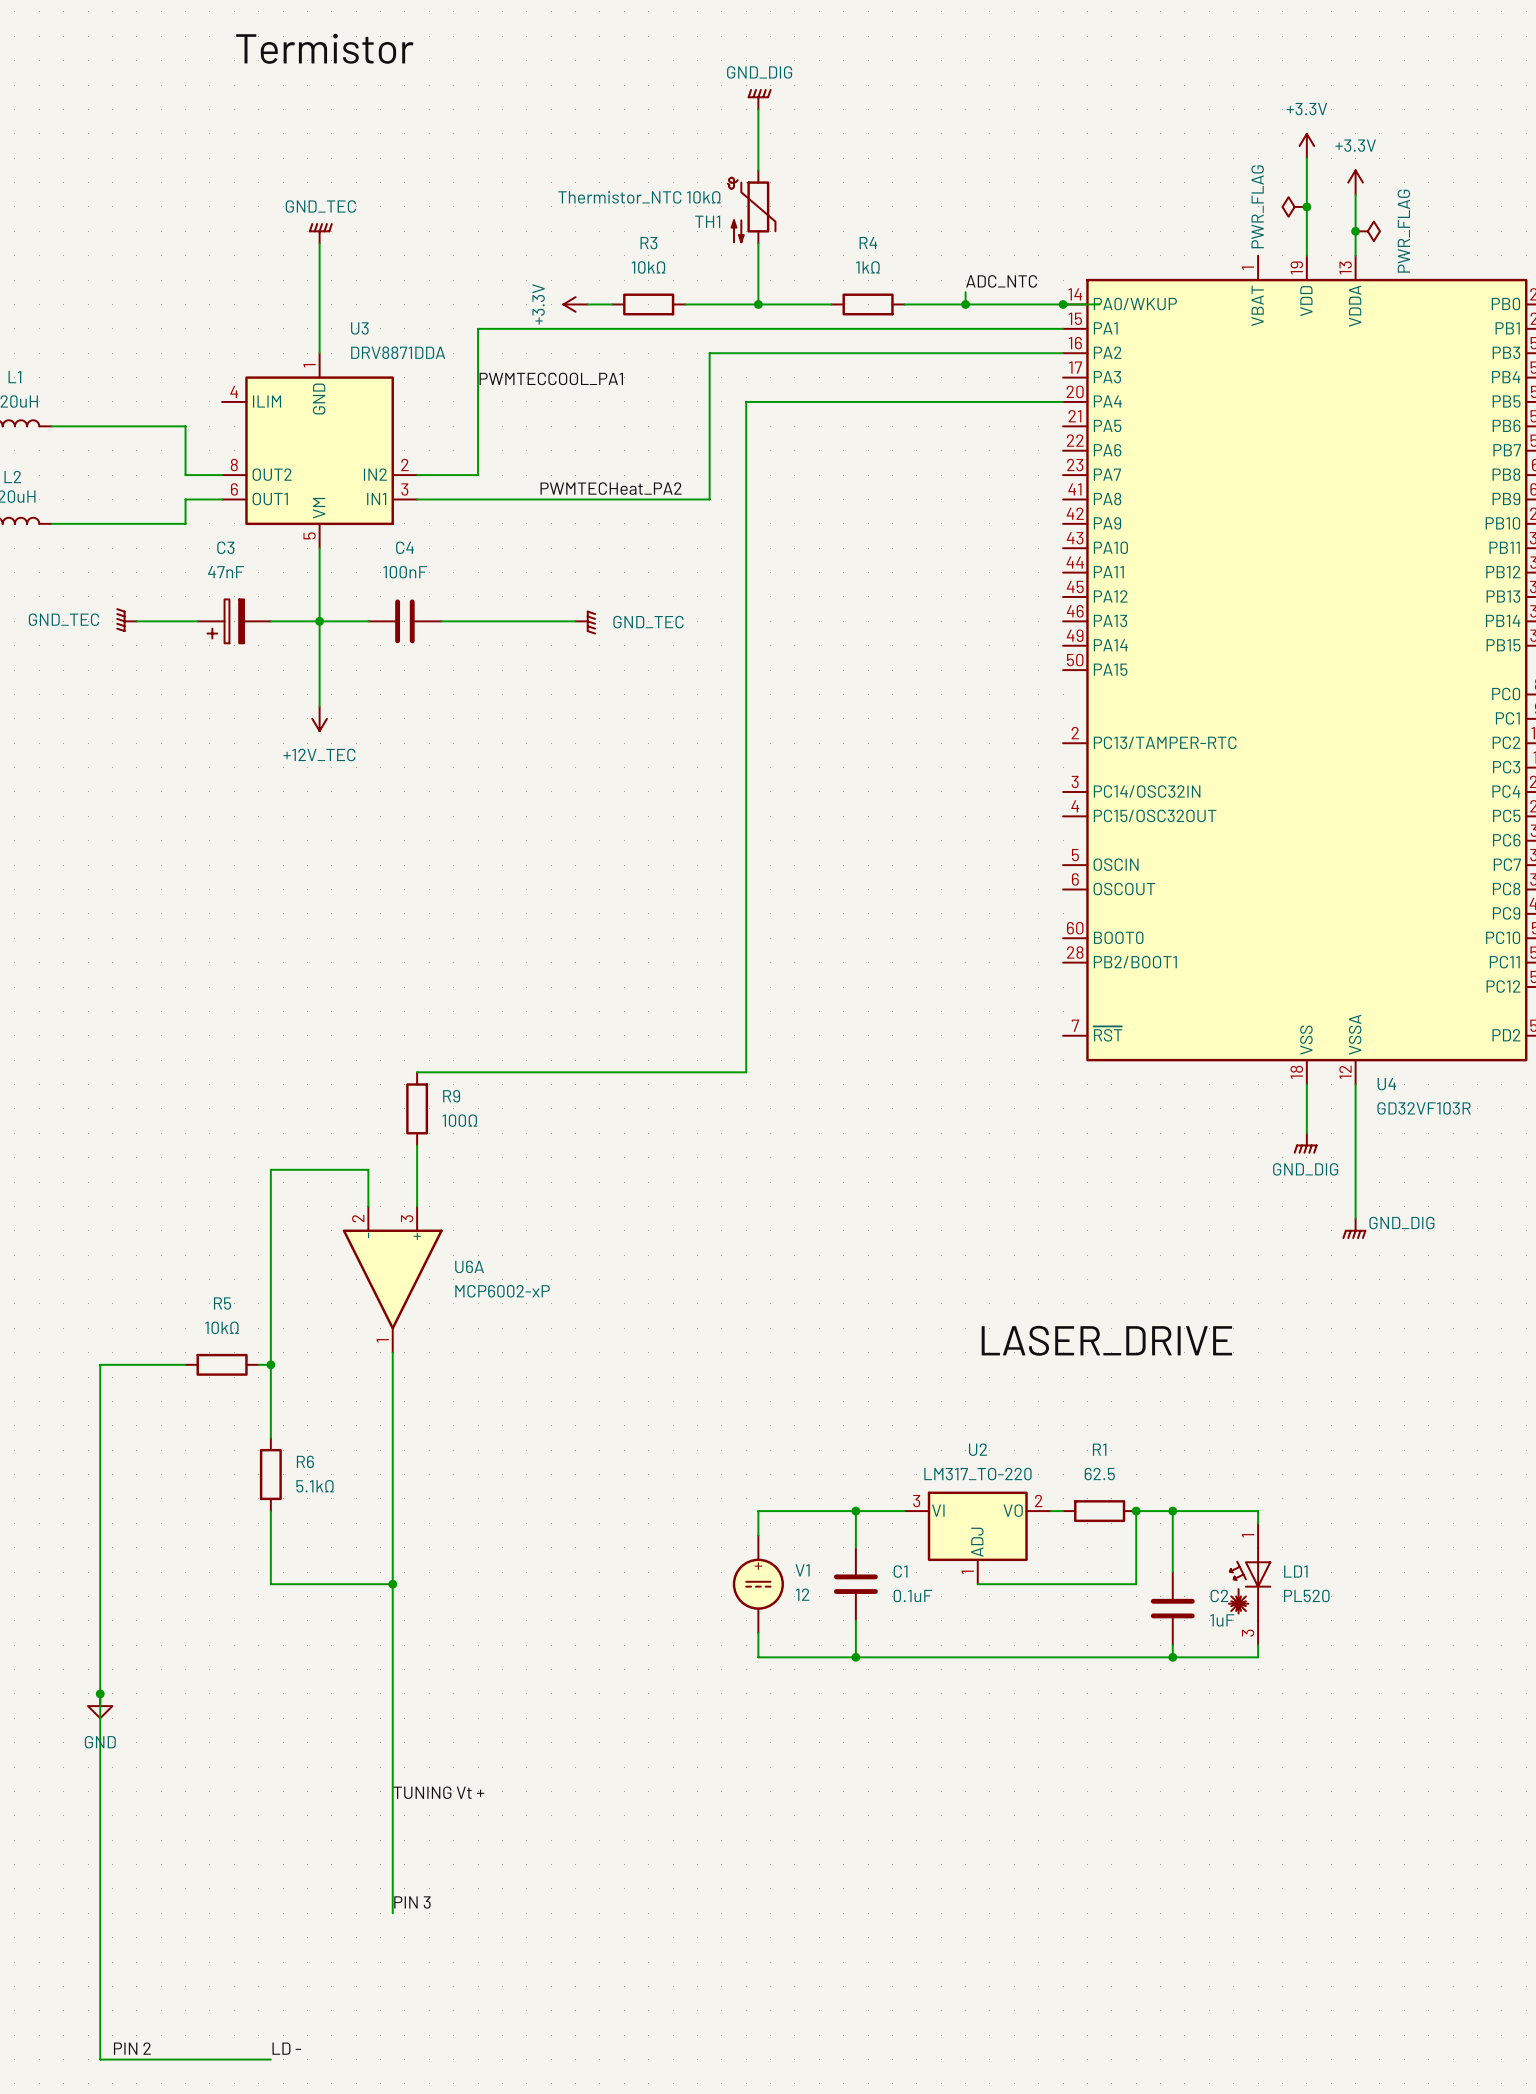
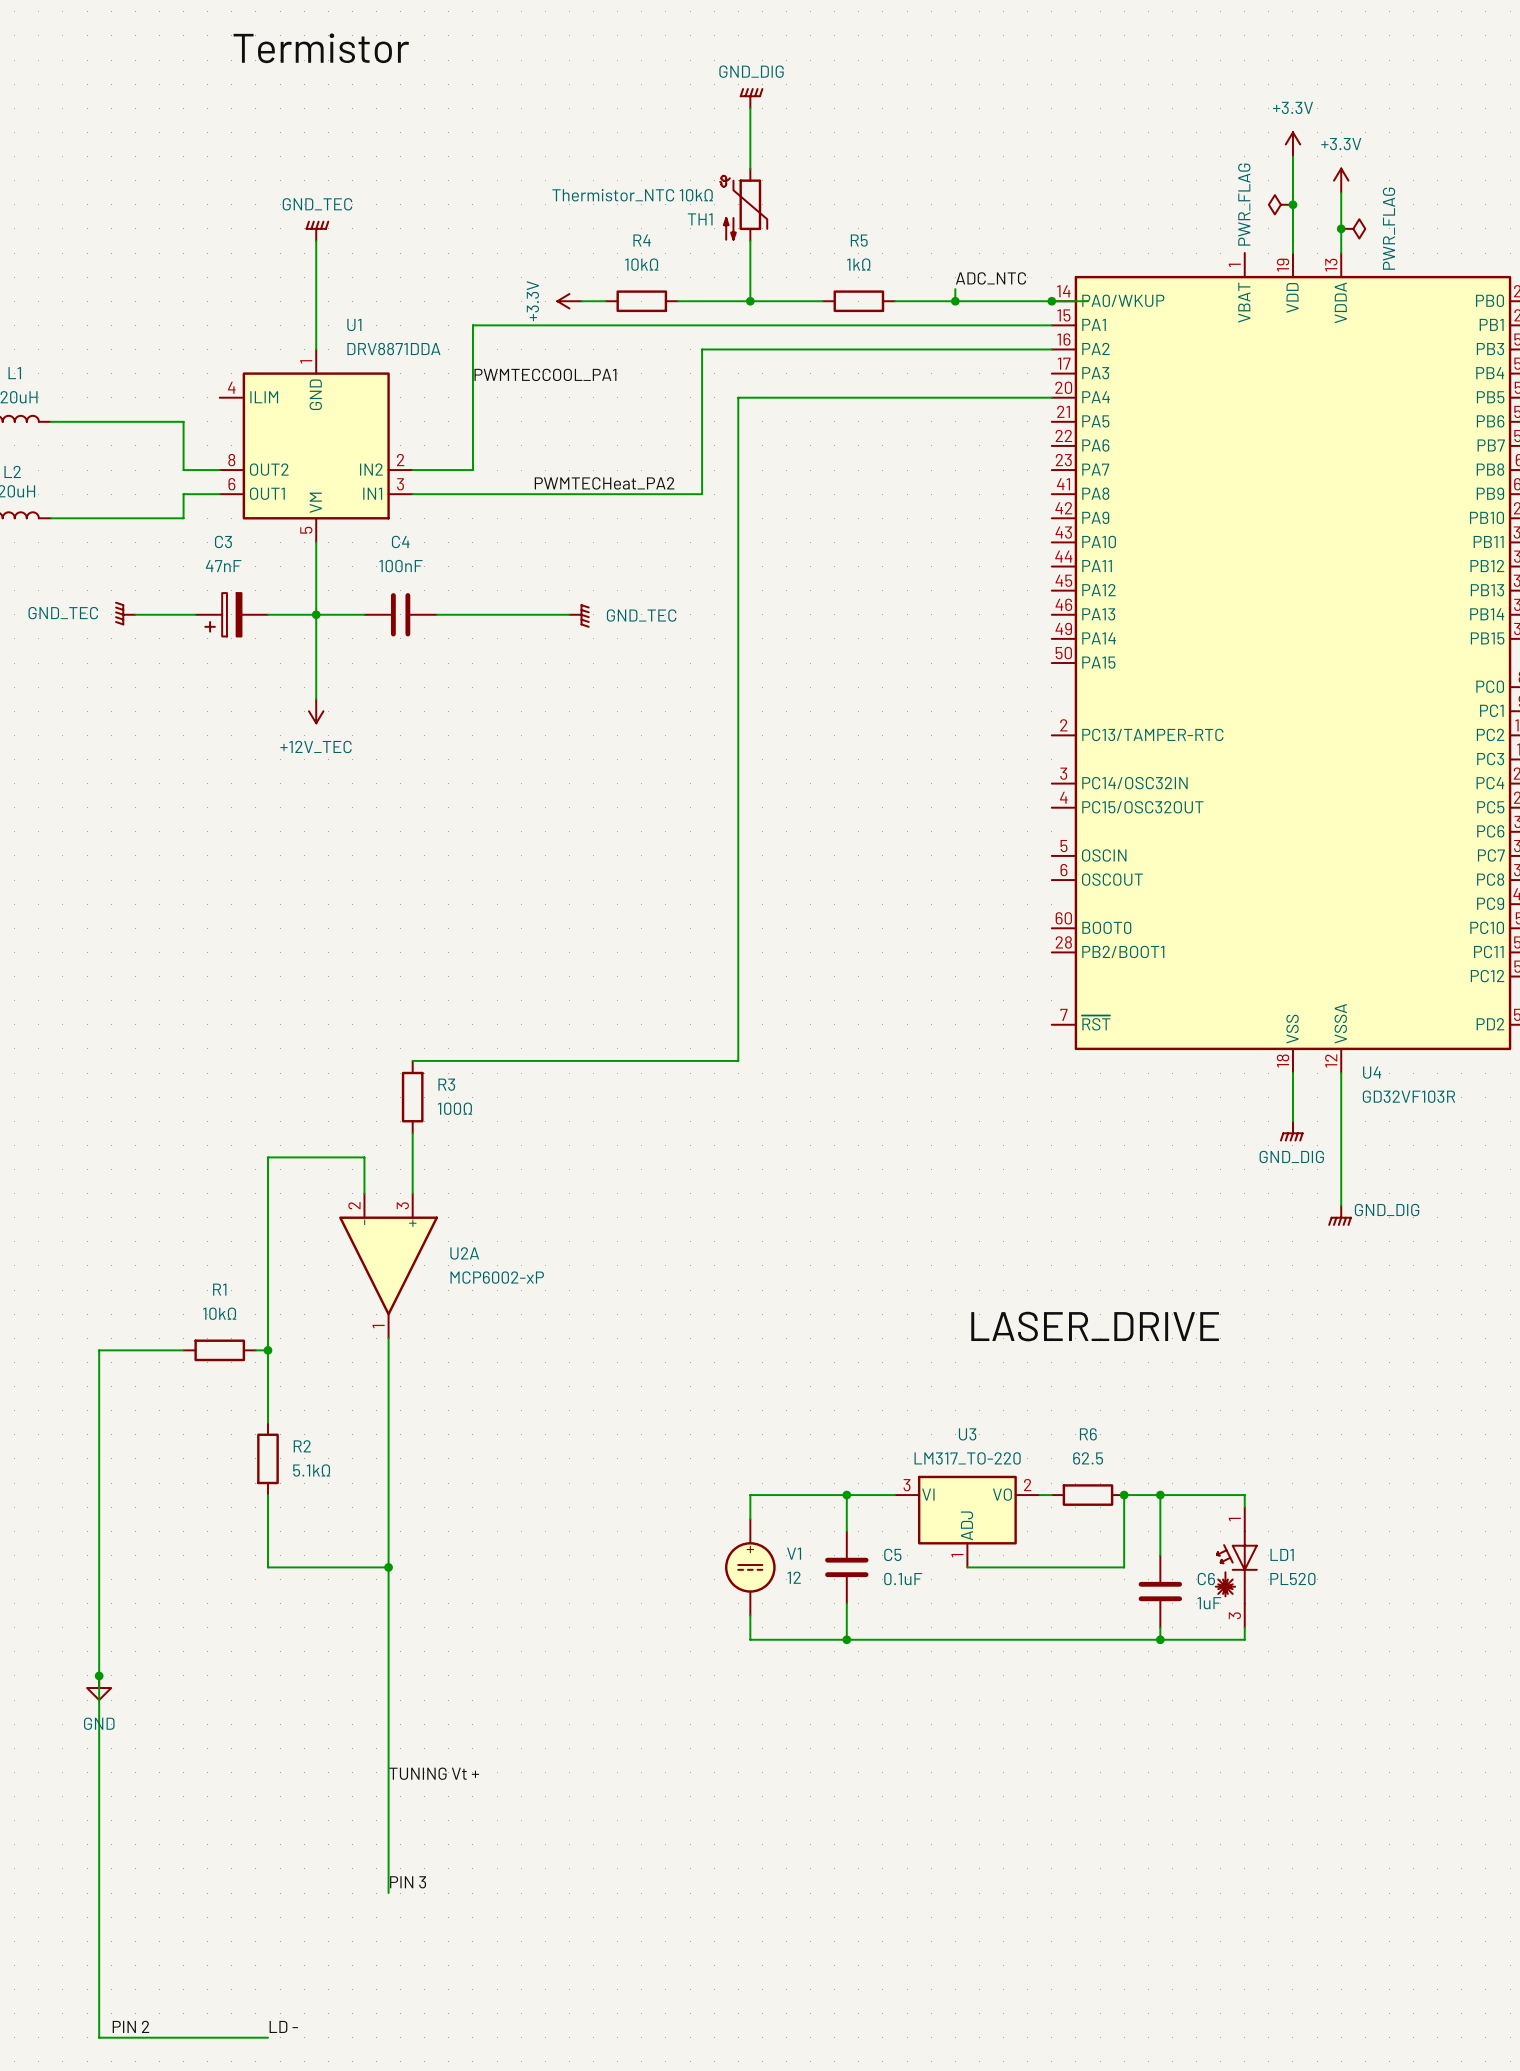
R3 name: R3 (648, 243) -> R4 (642, 240)
R4 name: R4 (868, 243) -> R5 (859, 240)
U3 name: U3 (359, 328) -> U1 (354, 324)
R9 name: R9 (451, 1096) -> R3 (446, 1084)
U6A name: U6A (469, 1266) -> U2A (464, 1253)
R5 name: R5 (222, 1303) -> R1 (219, 1289)
U2 name: U2 (978, 1449) -> U3 (967, 1434)
R1 name: R1 (1099, 1449) -> R6 (1088, 1434)
R6 name: R6 (305, 1461) -> R2 (302, 1446)
C1 name: C1 (900, 1571) -> C5 (892, 1554)
C2 name: C2 (1219, 1595) -> C6 (1206, 1579)

